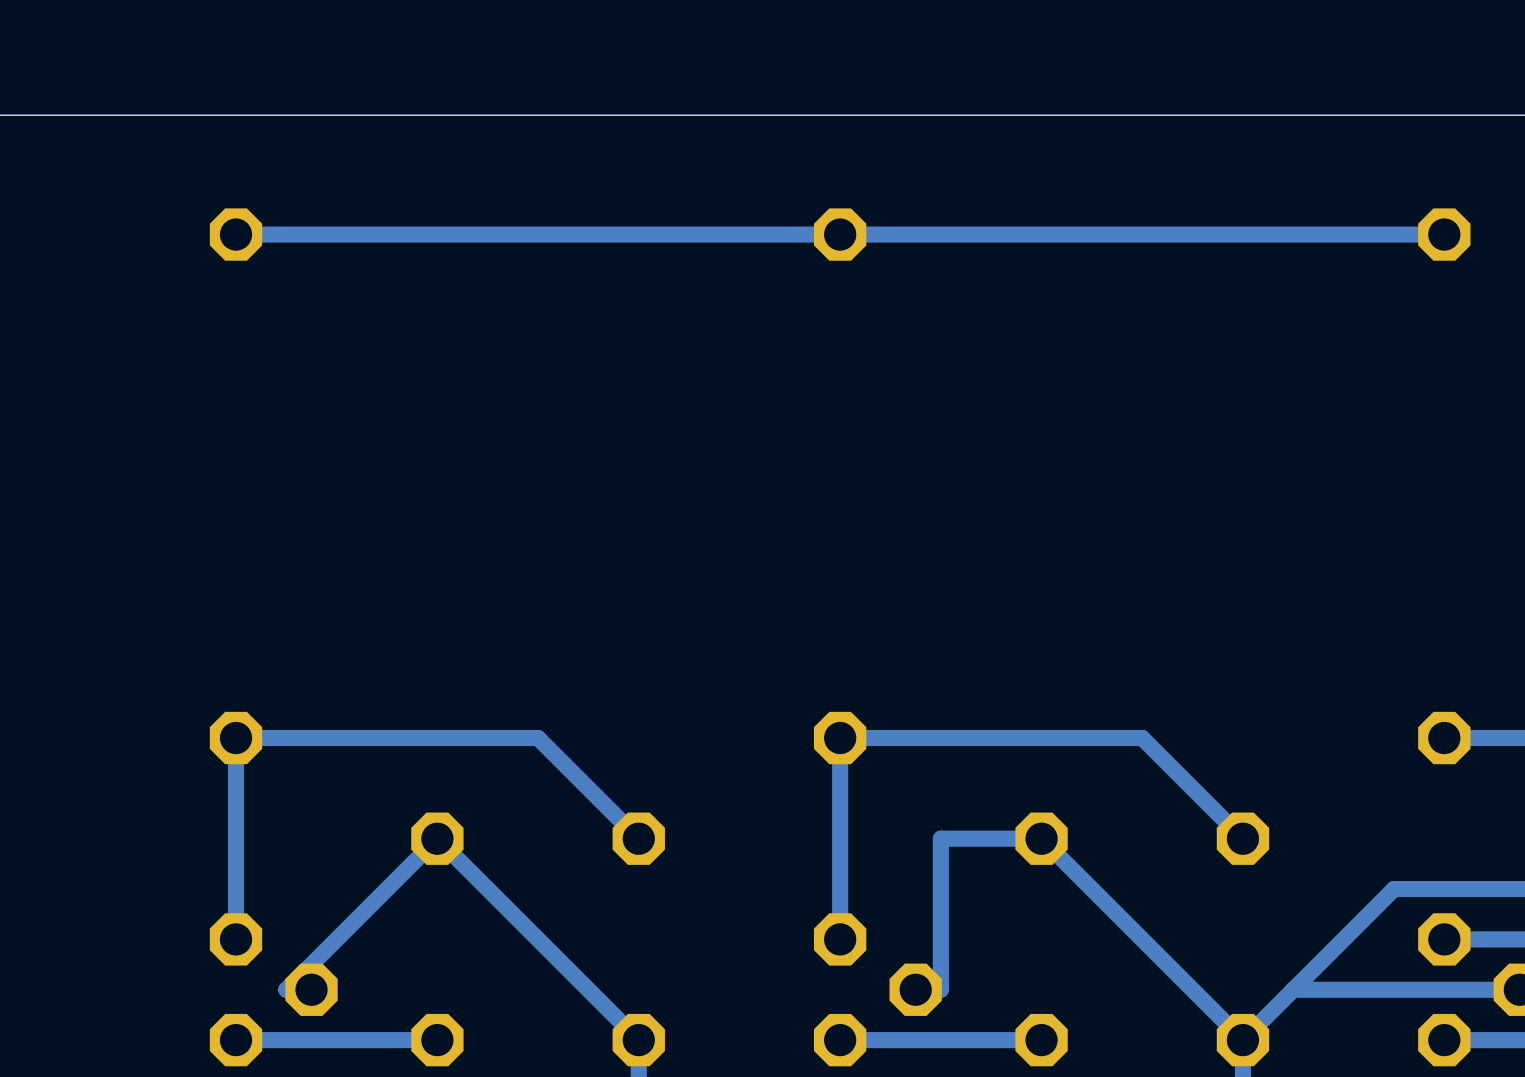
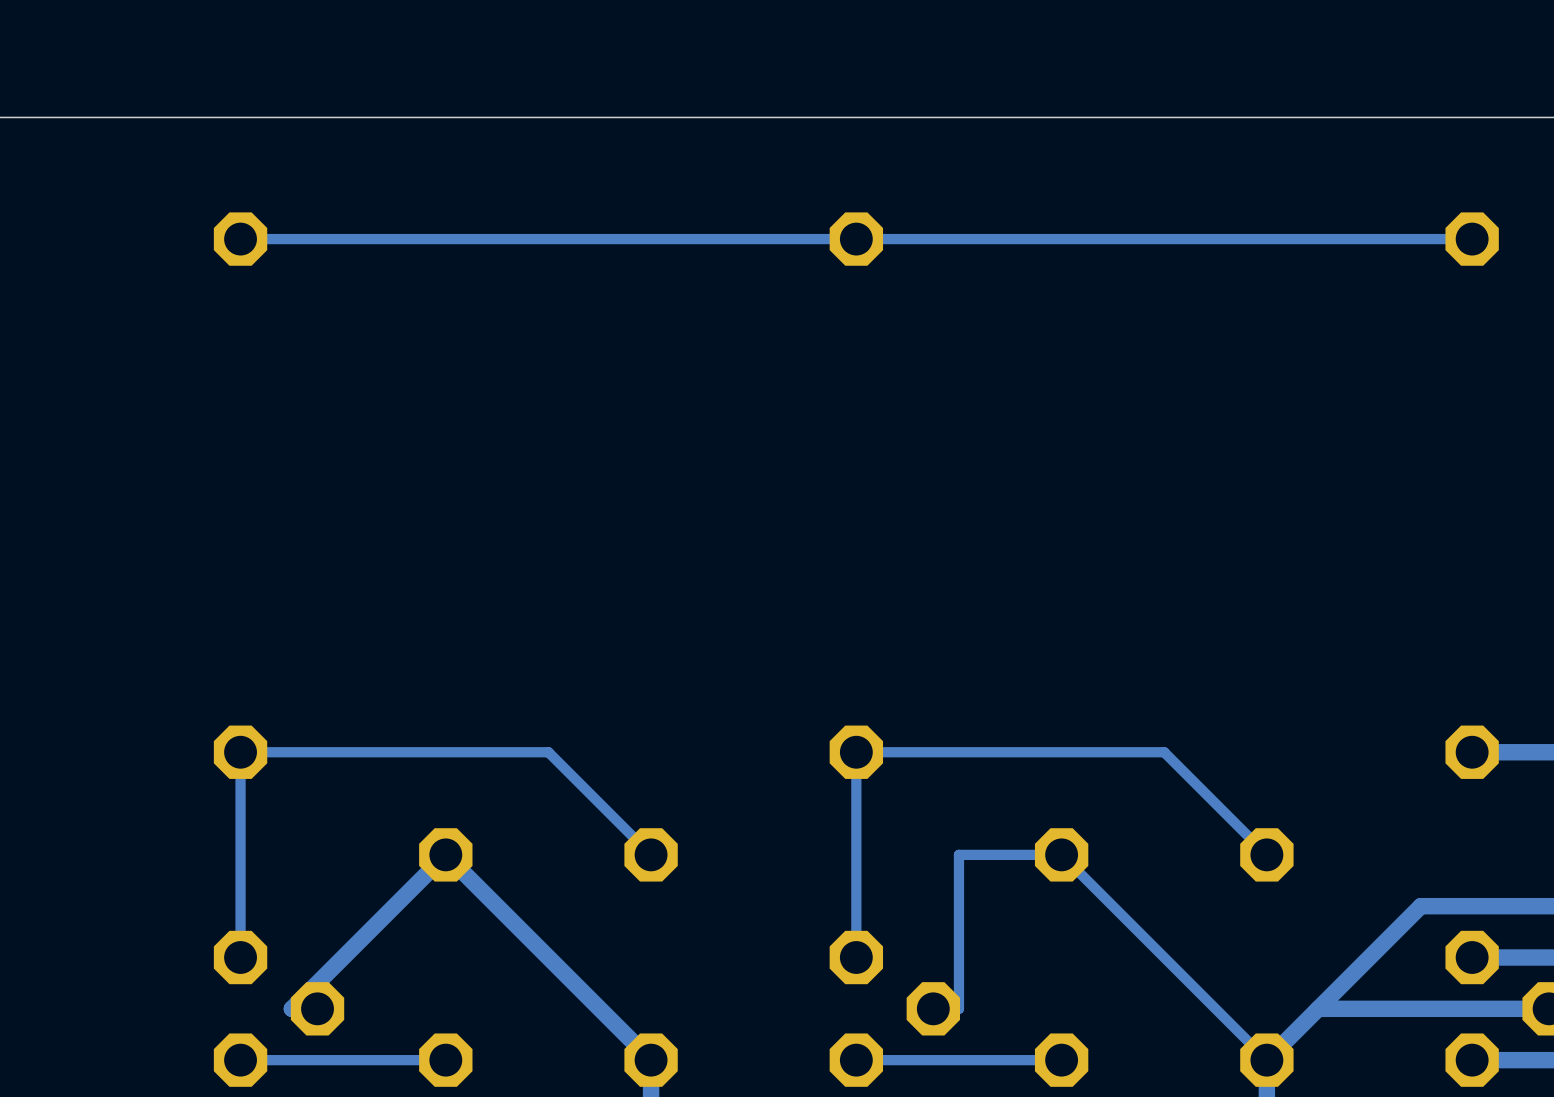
bottom track width: thick (1444, 234) (236, 234) -> thin (1472, 239) (240, 239)
bottom track width: thick (638, 838) (538, 738) (236, 738) (236, 939) -> thin (651, 854) (548, 752) (240, 752) (240, 957)
bottom track width: thick (1242, 838) (1142, 738) (840, 738) (840, 939) -> thin (1266, 854) (1164, 752) (856, 752) (856, 957)
bottom track width: thick (915, 989) (940, 989) (940, 838) (1041, 838) (1242, 1040) -> thin (933, 1008) (958, 1008) (958, 854) (1061, 854) (1266, 1060)
bottom track width: thick (437, 1040) (236, 1040) -> thin (445, 1060) (240, 1060)
bottom track width: thick (1041, 1040) (840, 1040) -> thin (1061, 1060) (856, 1060)

